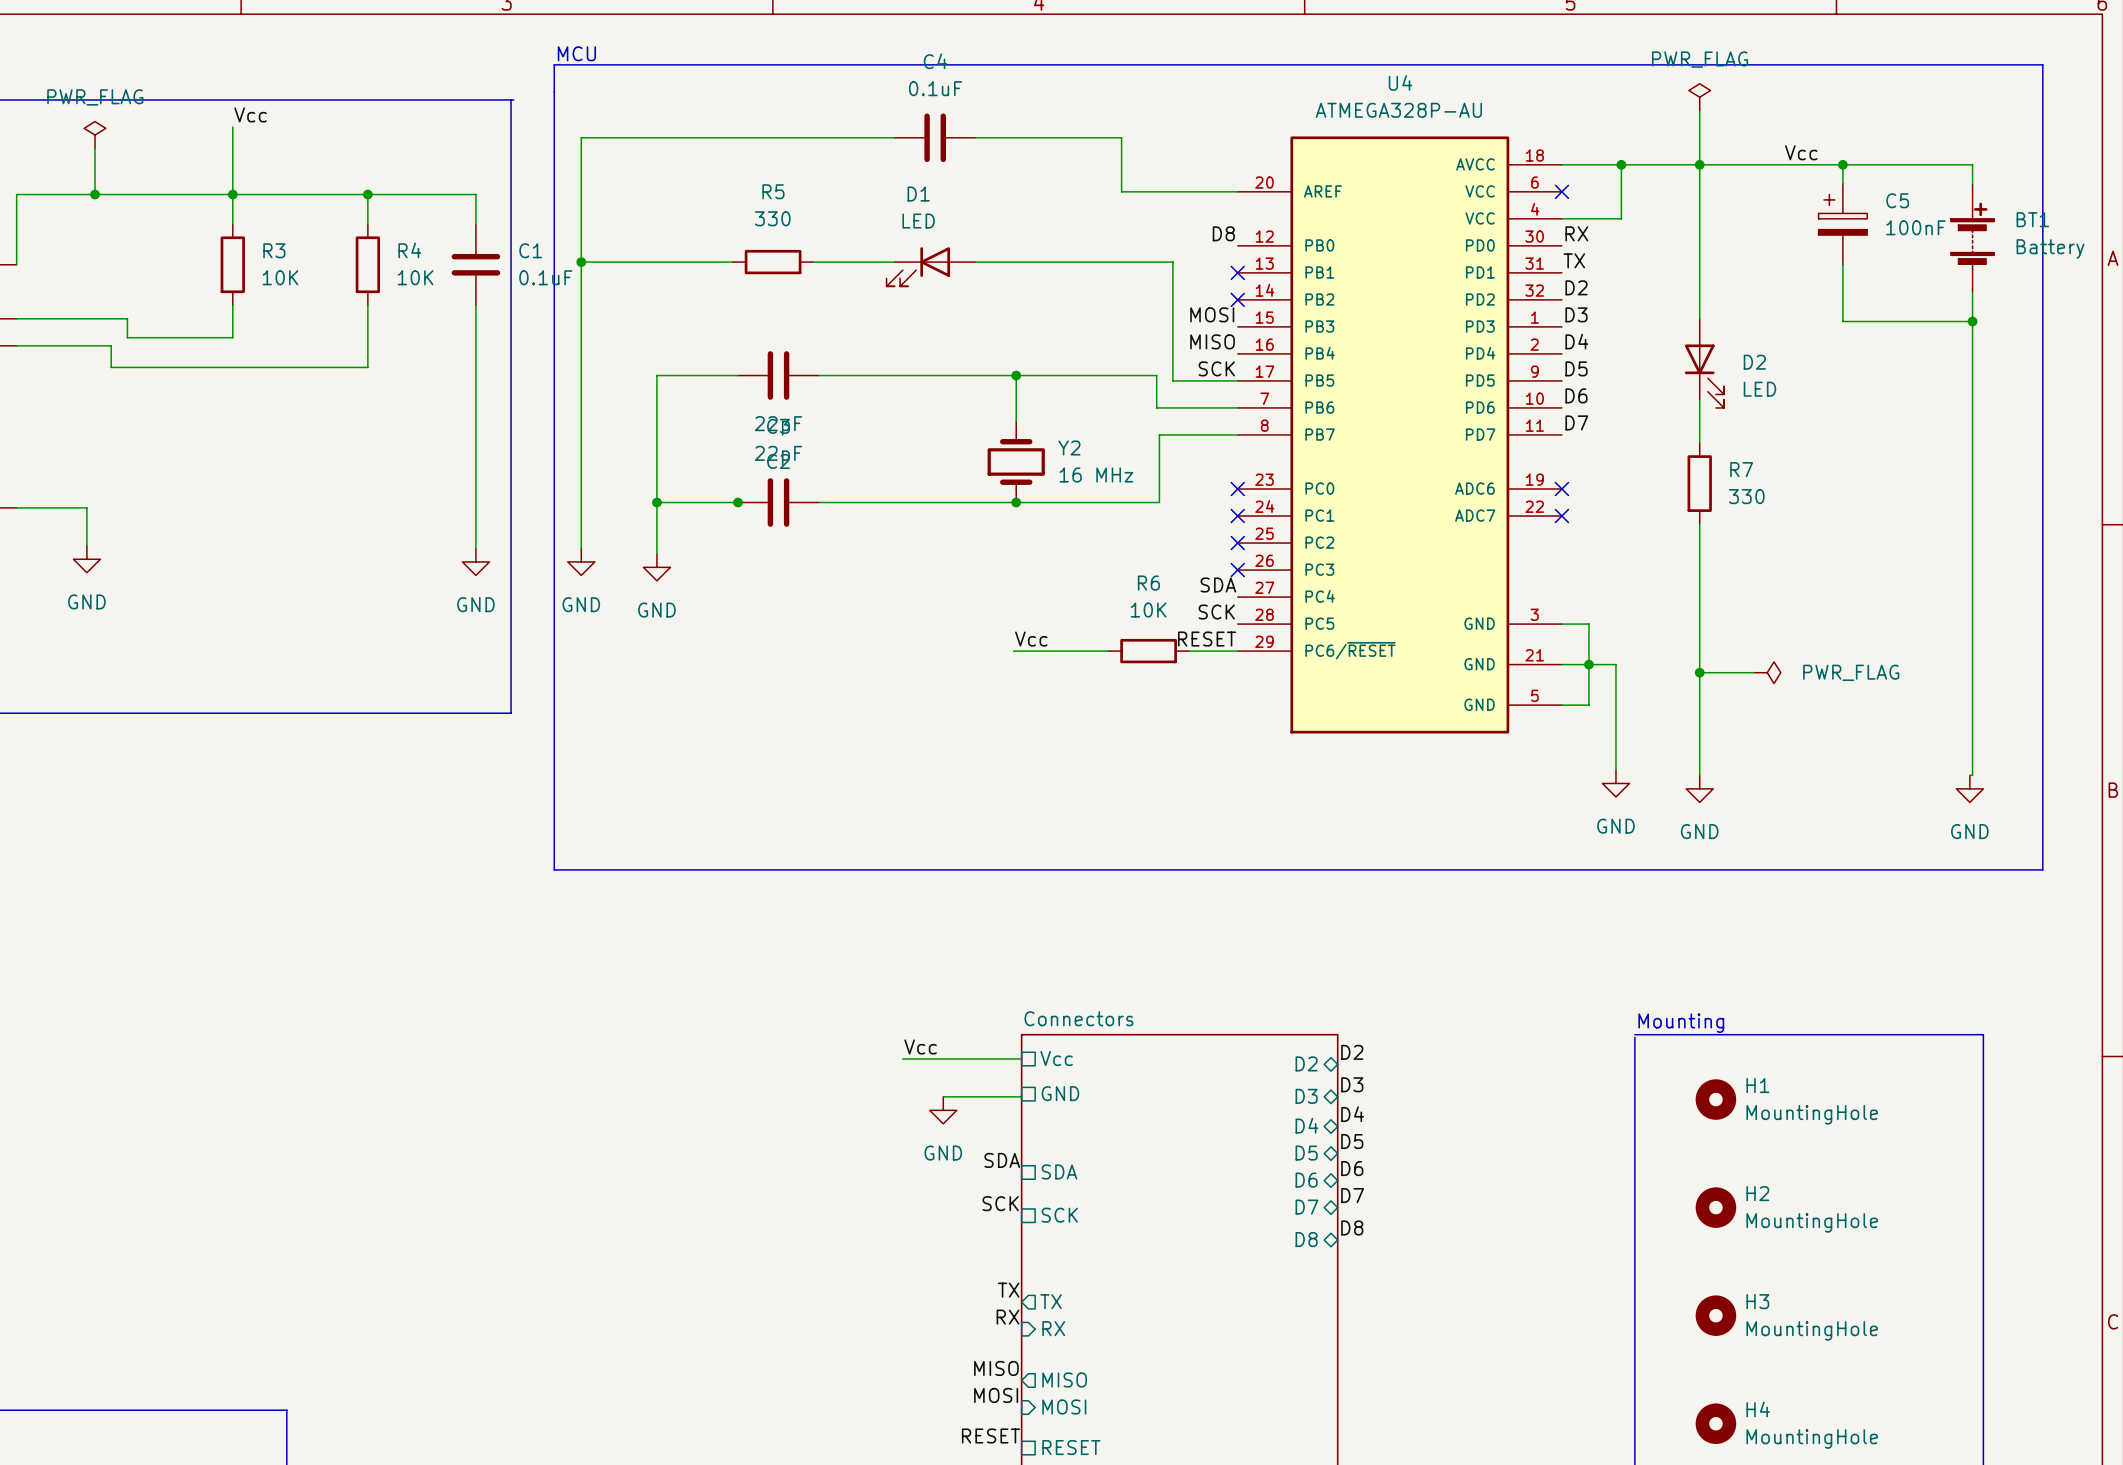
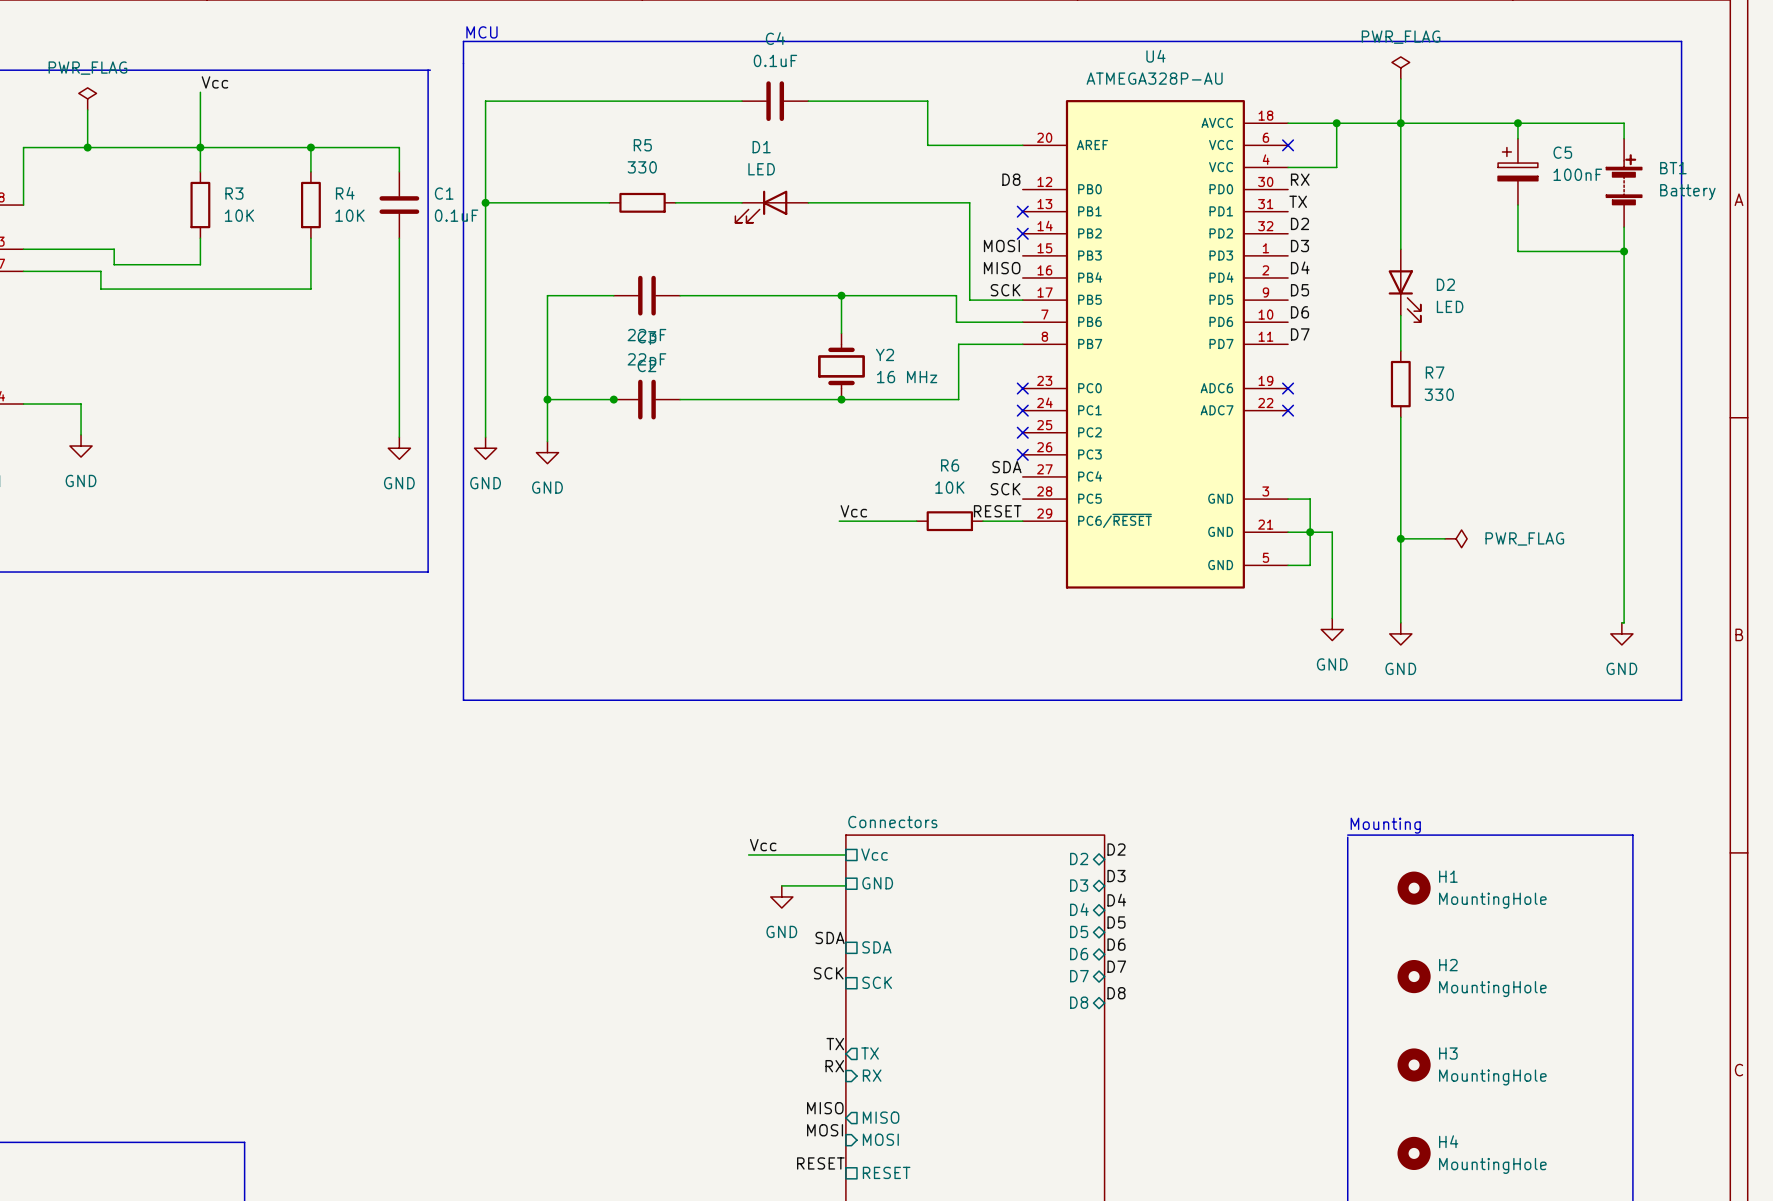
label: Vcc (1801, 152) -> none

